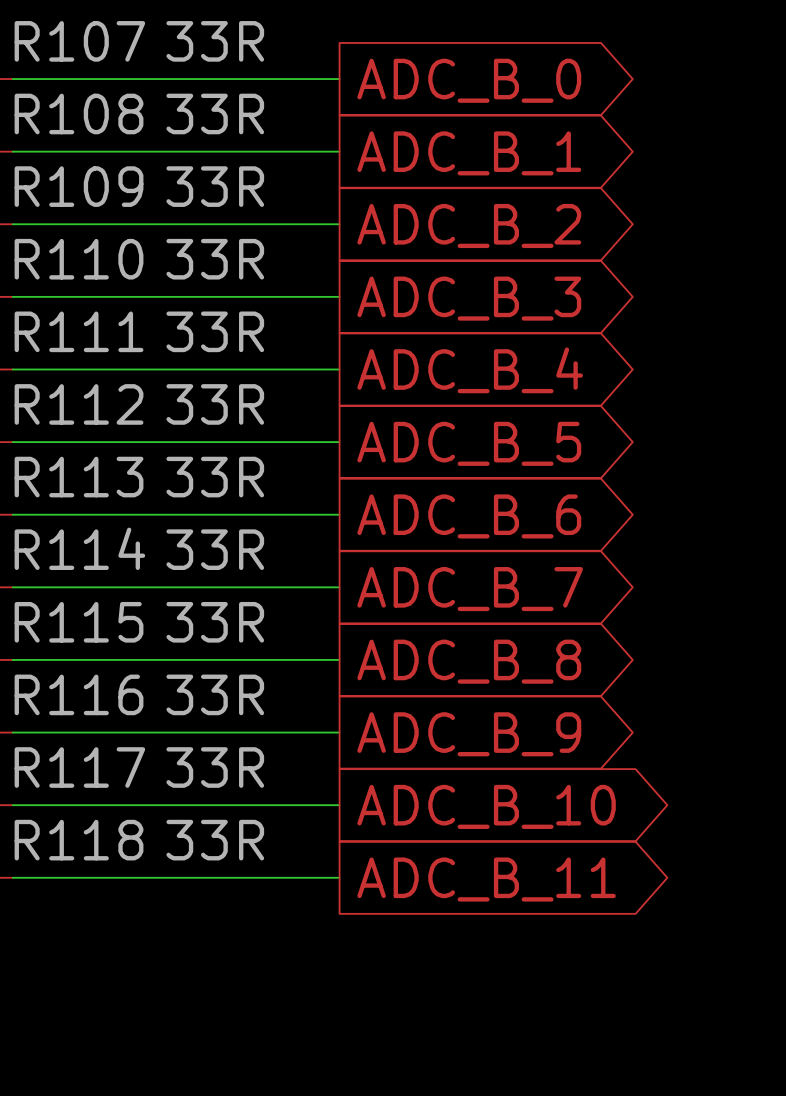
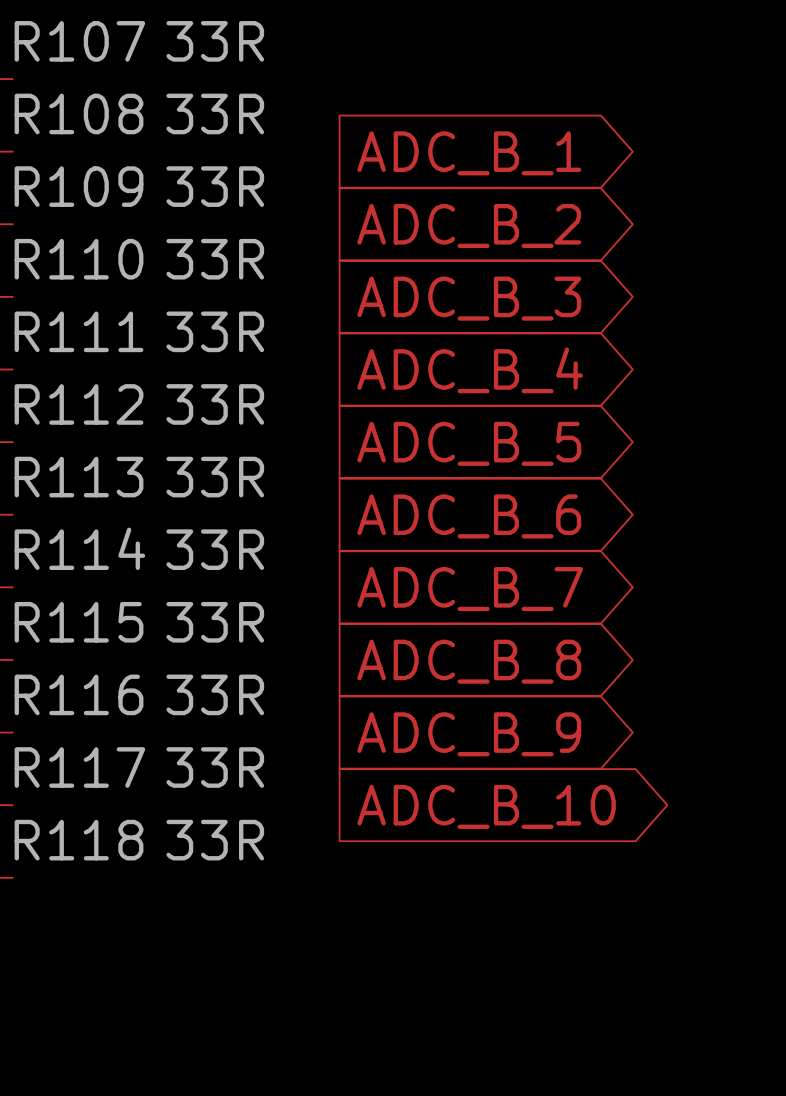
wire: (12, 79) (339, 79) -> none
global label: ADC_B_0 (469, 80) -> none
wire: (12, 151) (339, 151) -> none
wire: (12, 224) (339, 224) -> none
wire: (12, 296) (339, 296) -> none
wire: (12, 369) (339, 369) -> none
wire: (12, 442) (339, 442) -> none
wire: (12, 514) (339, 514) -> none
wire: (12, 587) (339, 587) -> none
wire: (12, 659) (339, 659) -> none
wire: (12, 732) (339, 732) -> none
wire: (12, 805) (339, 805) -> none
wire: (12, 877) (339, 877) -> none
global label: ADC_B_11 (486, 879) -> none

